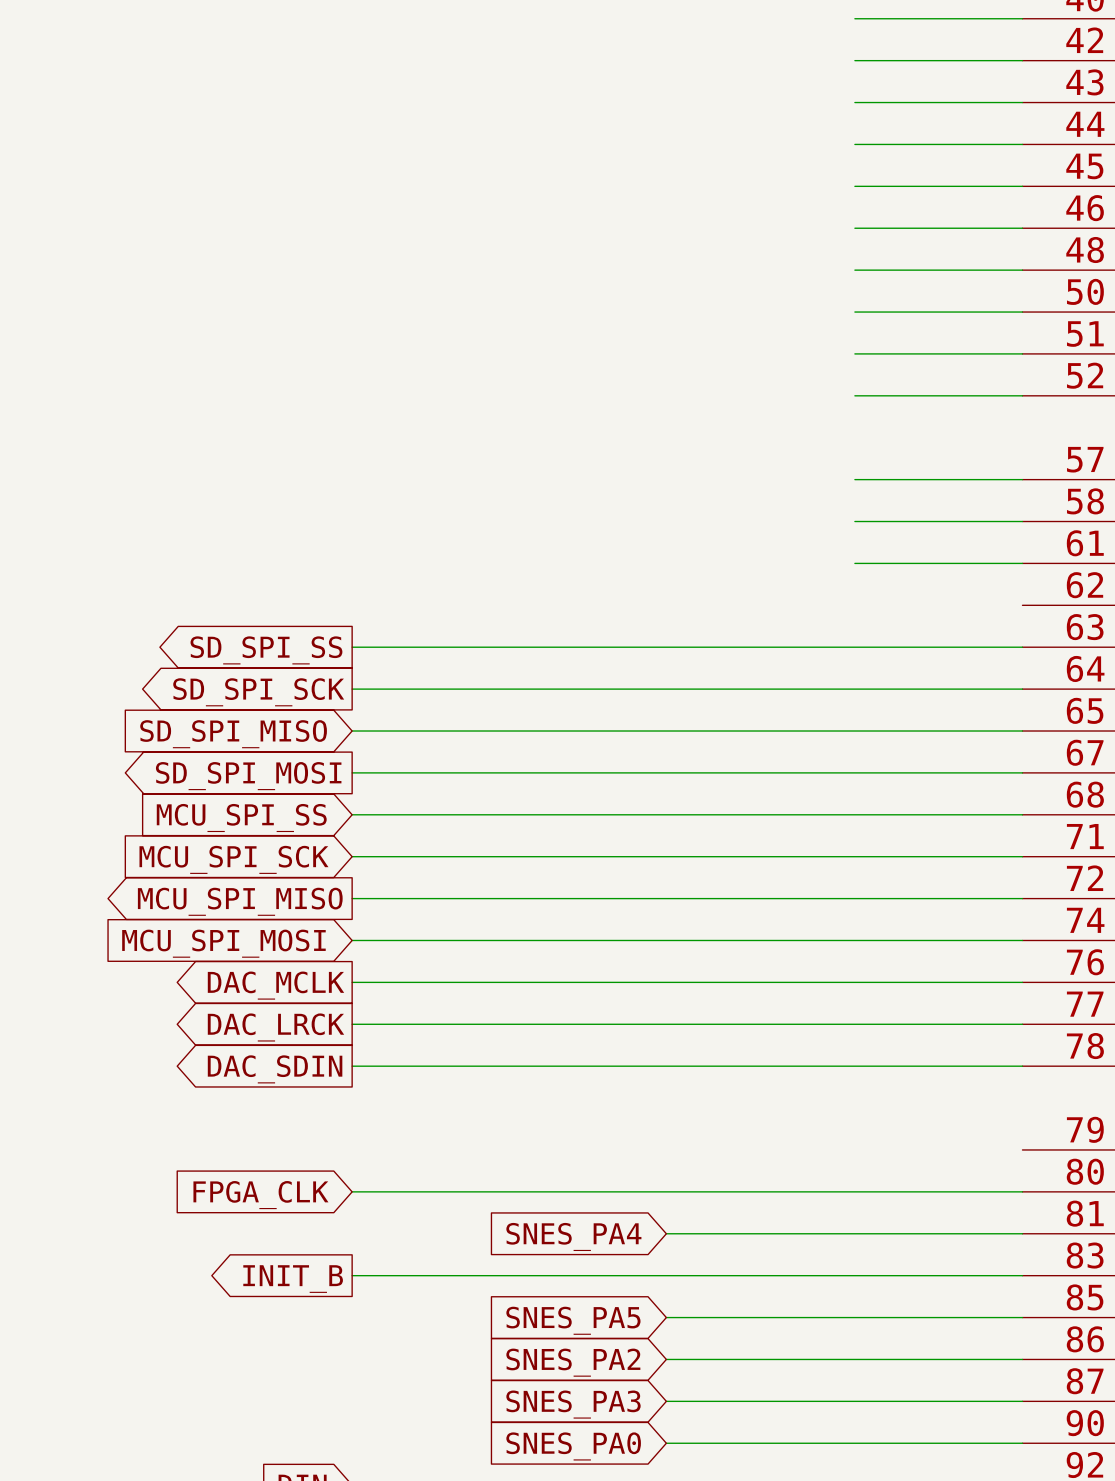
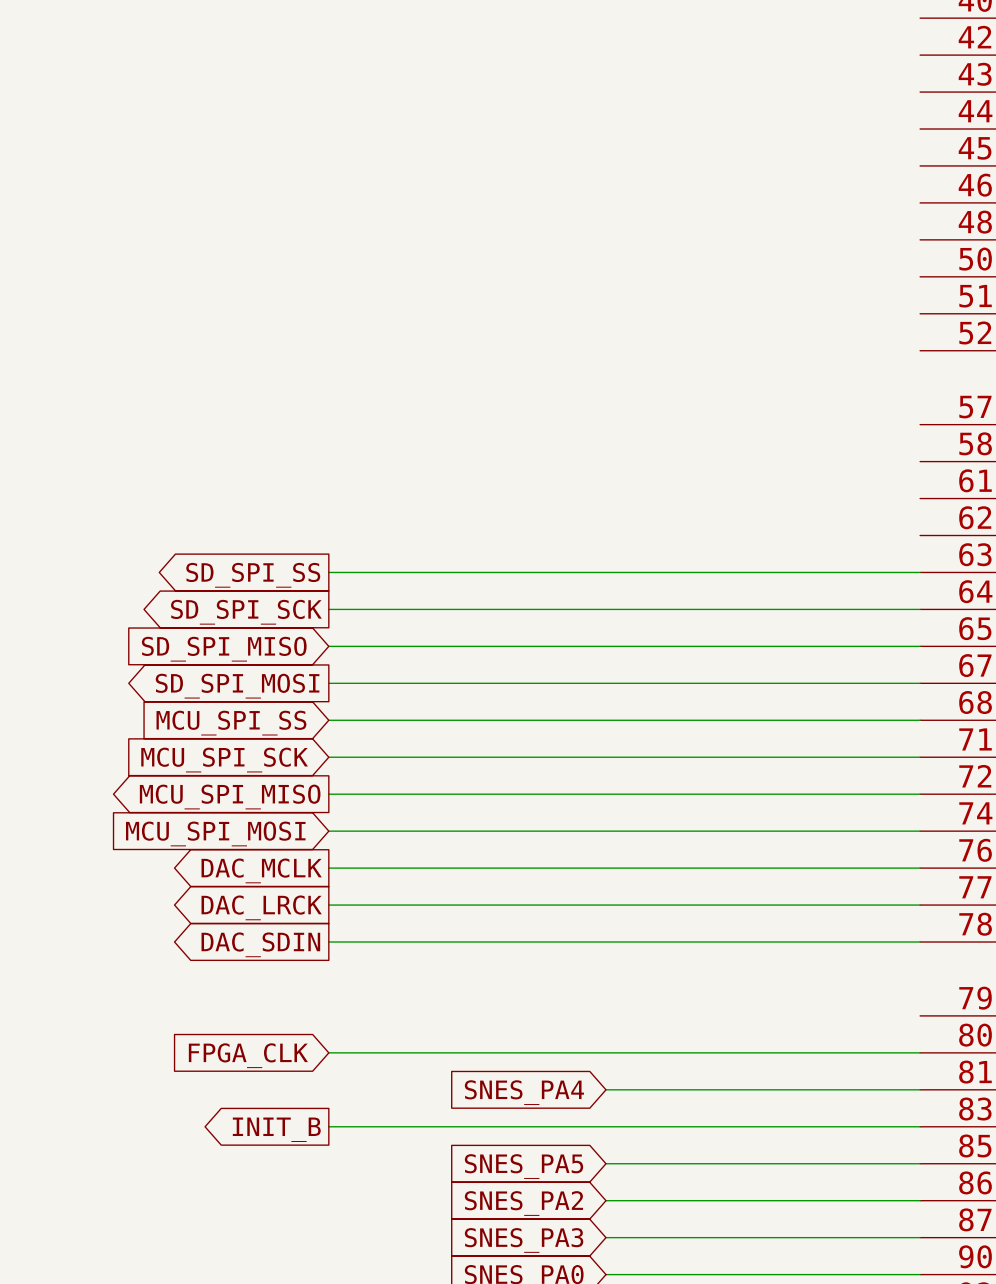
wire: (854, 18) (1022, 18) -> none
wire: (854, 60) (1022, 60) -> none
wire: (854, 102) (1022, 102) -> none
wire: (854, 144) (1022, 144) -> none
wire: (854, 186) (1022, 186) -> none
wire: (854, 228) (1022, 228) -> none
wire: (854, 270) (1022, 270) -> none
wire: (854, 312) (1022, 312) -> none
wire: (854, 353) (1022, 353) -> none
wire: (854, 395) (1022, 395) -> none
wire: (854, 479) (1022, 479) -> none
wire: (854, 521) (1022, 521) -> none
wire: (854, 563) (1022, 563) -> none

